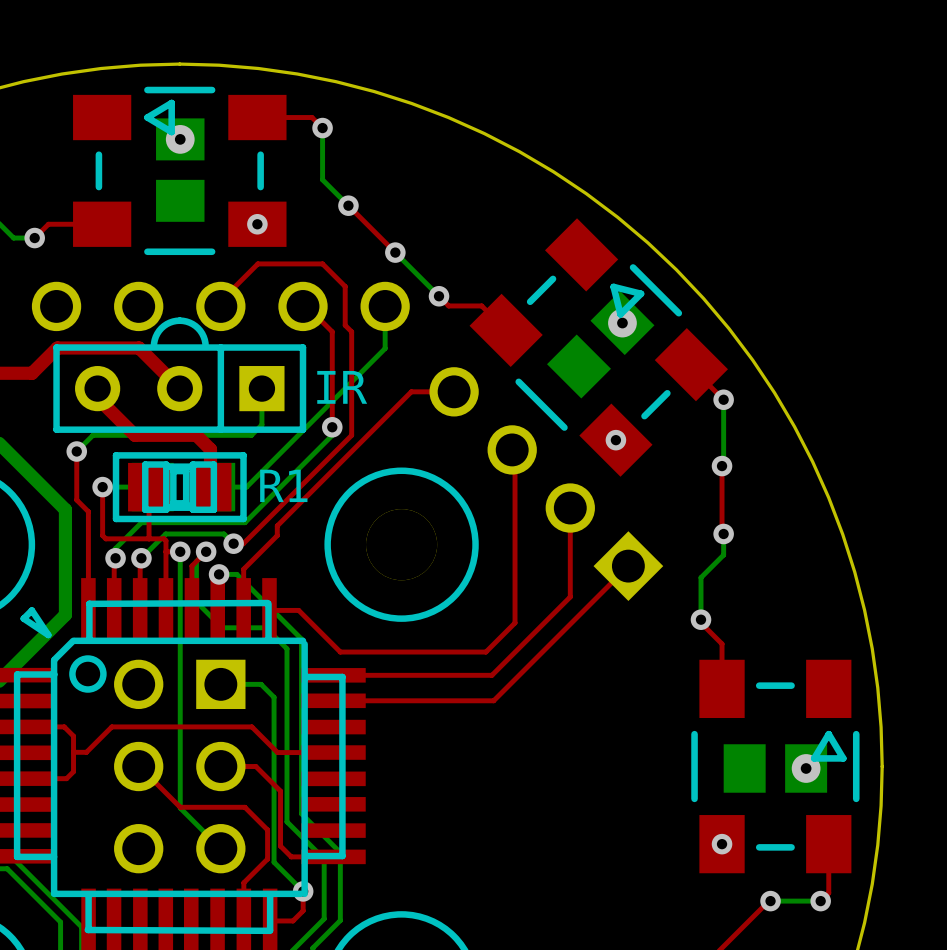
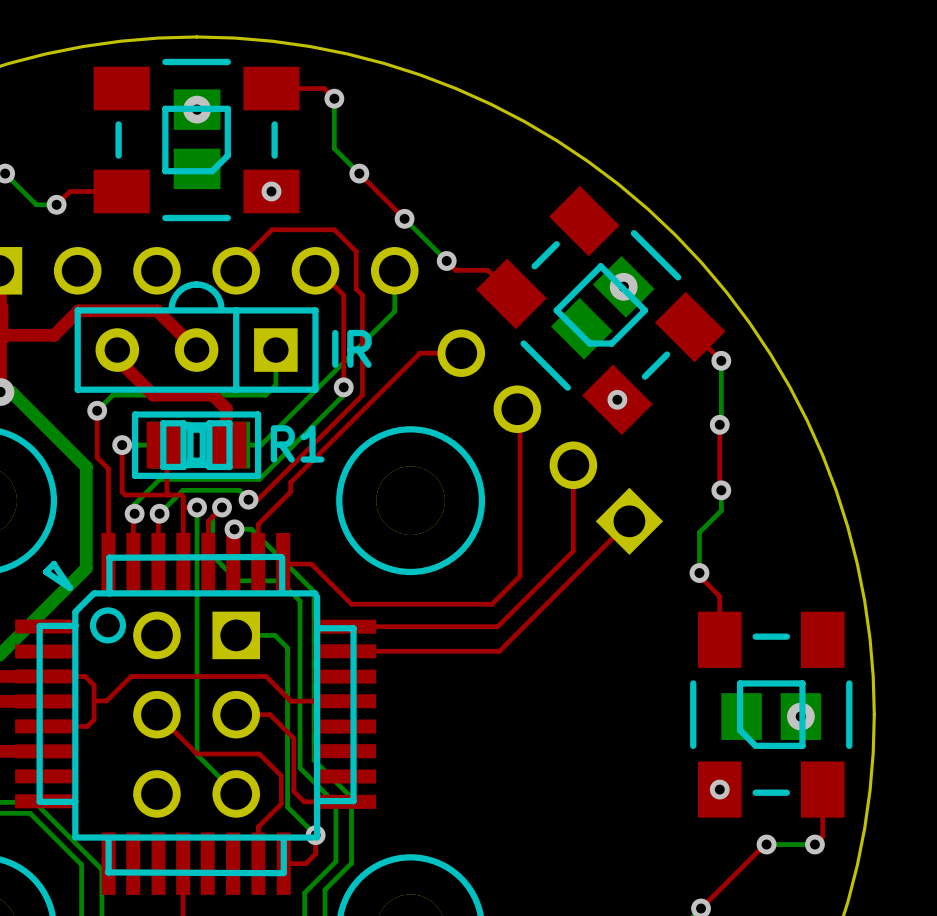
part footprint: [73, 86, 287, 256] -> [93, 58, 300, 222]
part footprint: [469, 218, 728, 477] -> [476, 185, 726, 436]
part footprint: [691, 659, 860, 874] -> [690, 611, 853, 818]

